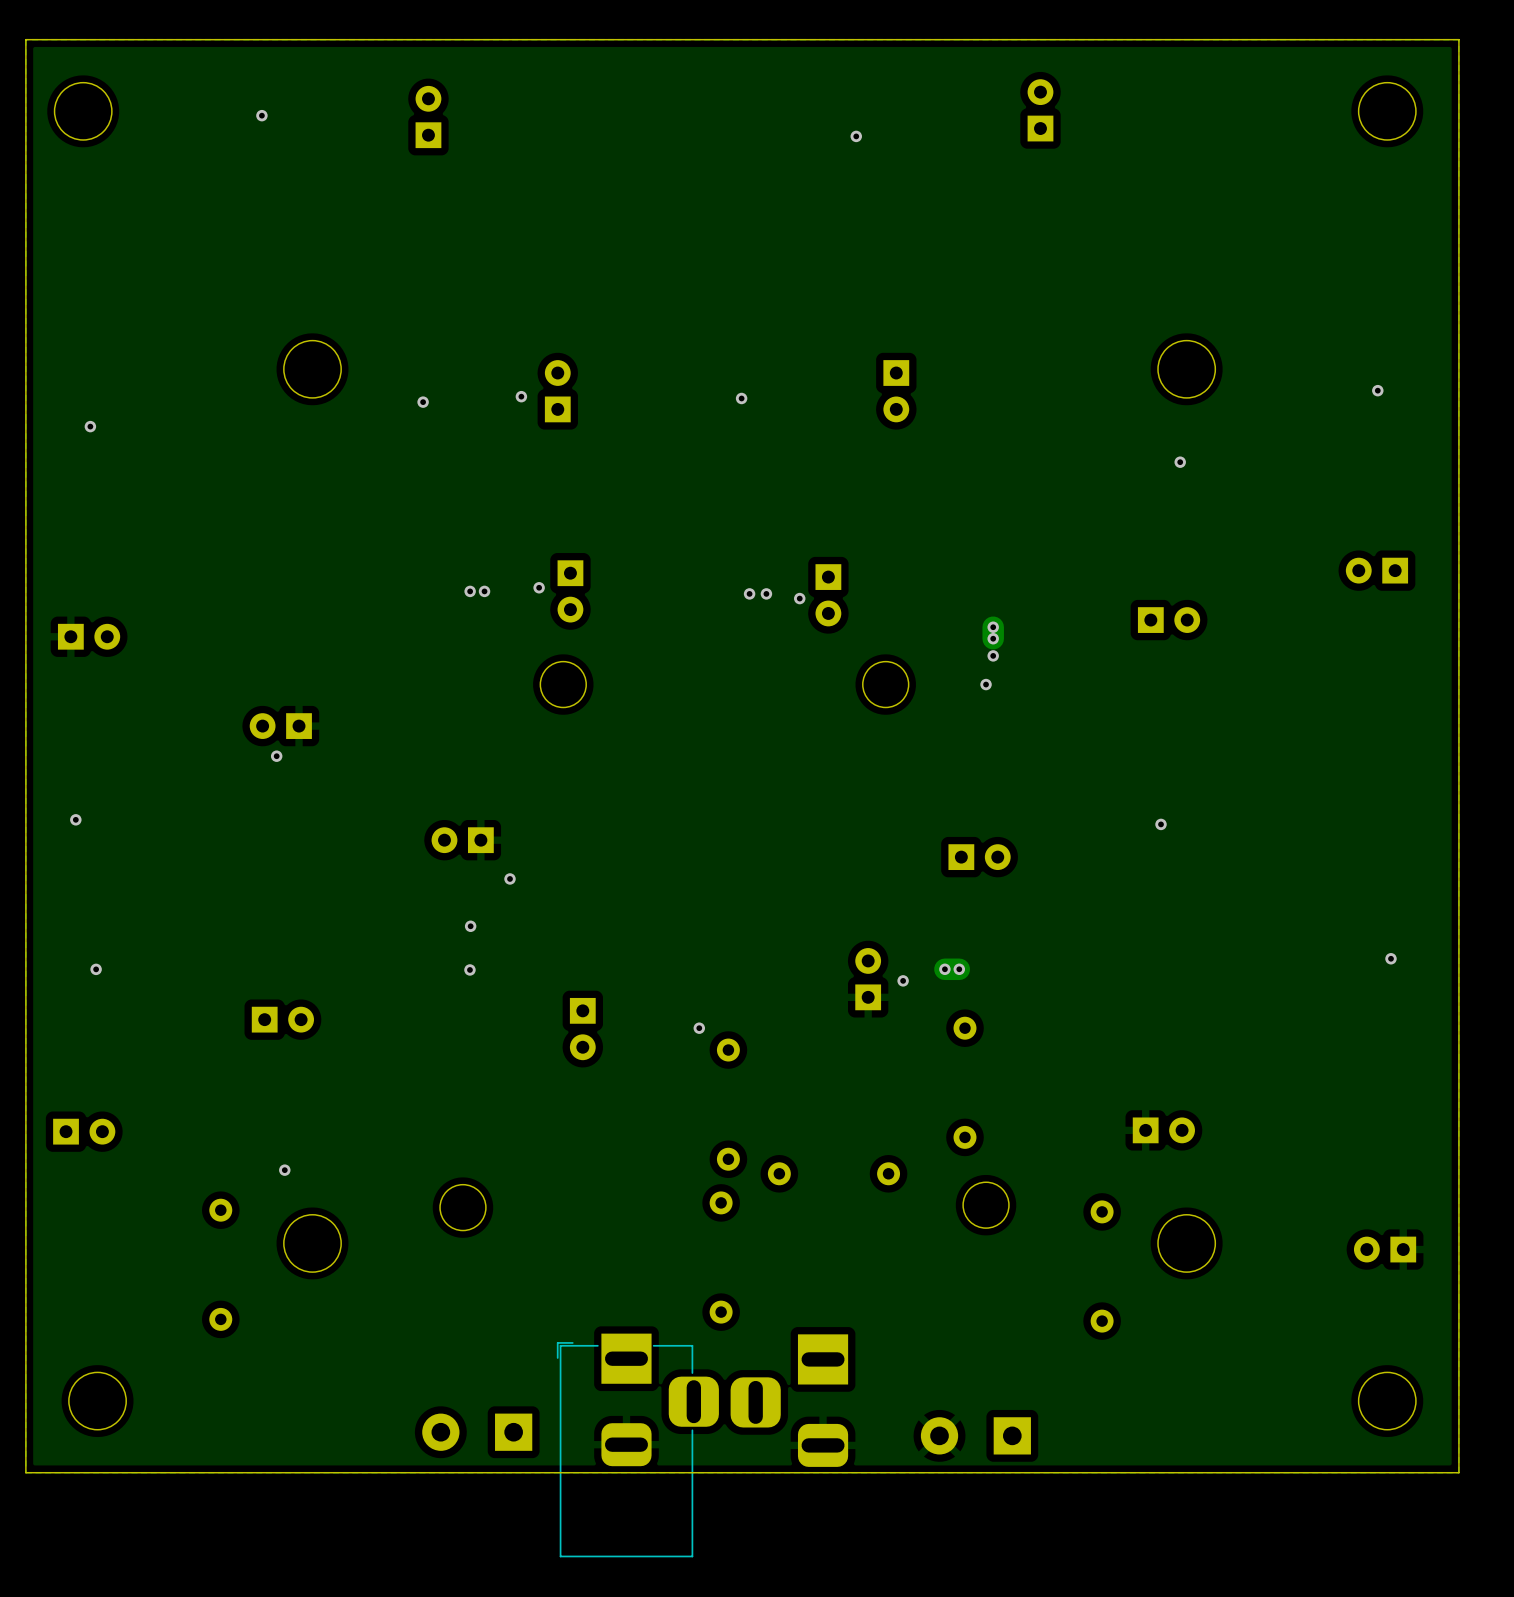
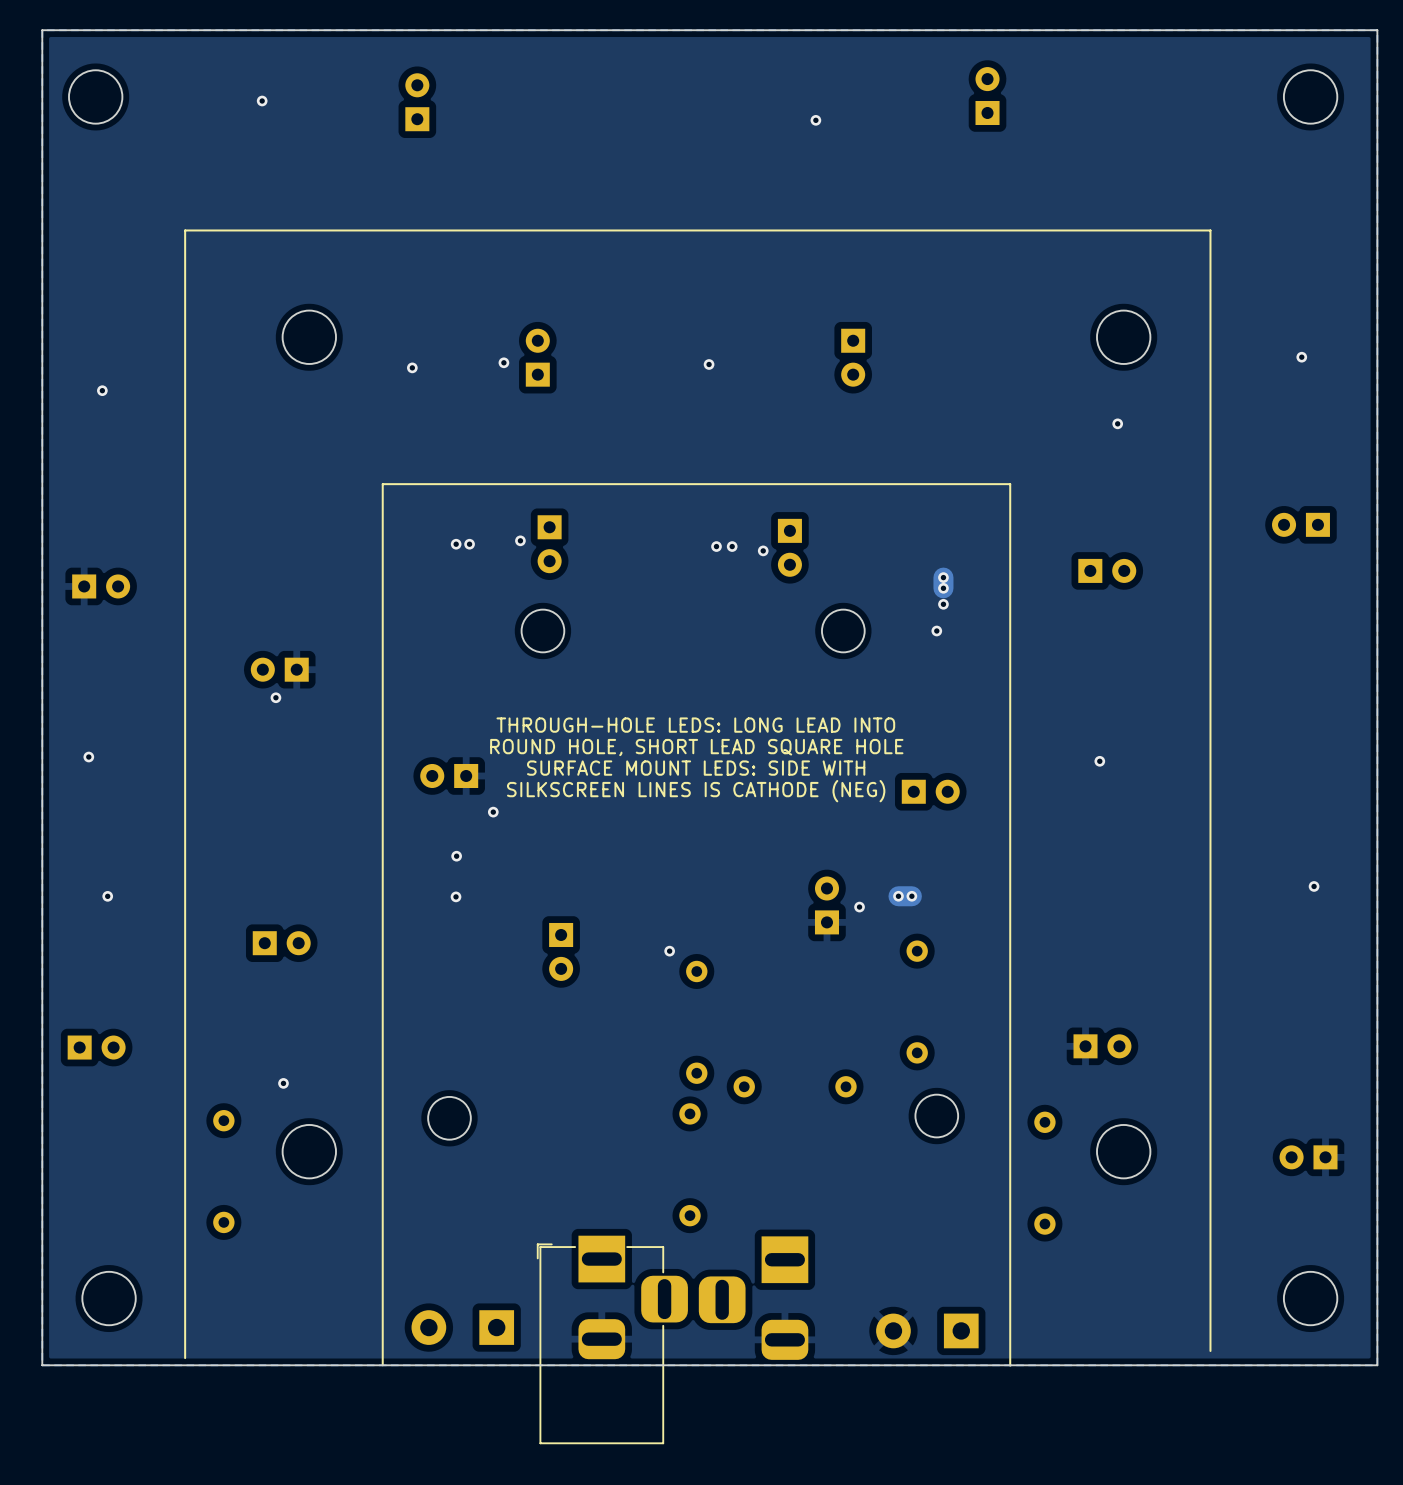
text: none -> THROUGH-HOLE LEDS: LONG LEAD INTO (695, 725)
text: none -> ROUND HOLE, SHORT LEAD SQUARE HOLE (696, 747)
text: none -> SURFACE MOUNT LEDS: SIDE WITH (696, 768)
text: none -> SILKSCREEN LINES IS CATHODE (NEG) (696, 791)
line: none -> (1210, 1351) (1210, 230) (185, 230) (185, 1358)
line: none -> (382, 1365) (382, 484) (1010, 484) (1010, 1365)

